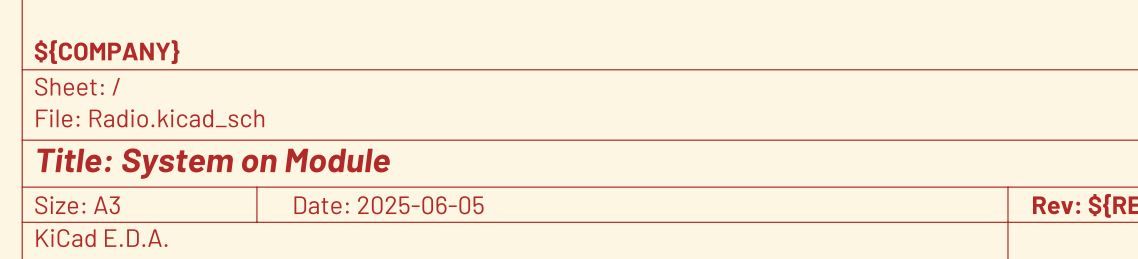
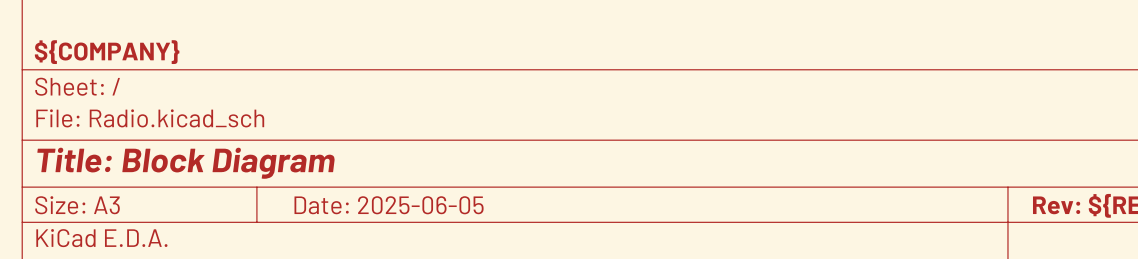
title block: Title: System on Module (213, 163) -> Title: Block Diagram (186, 163)

